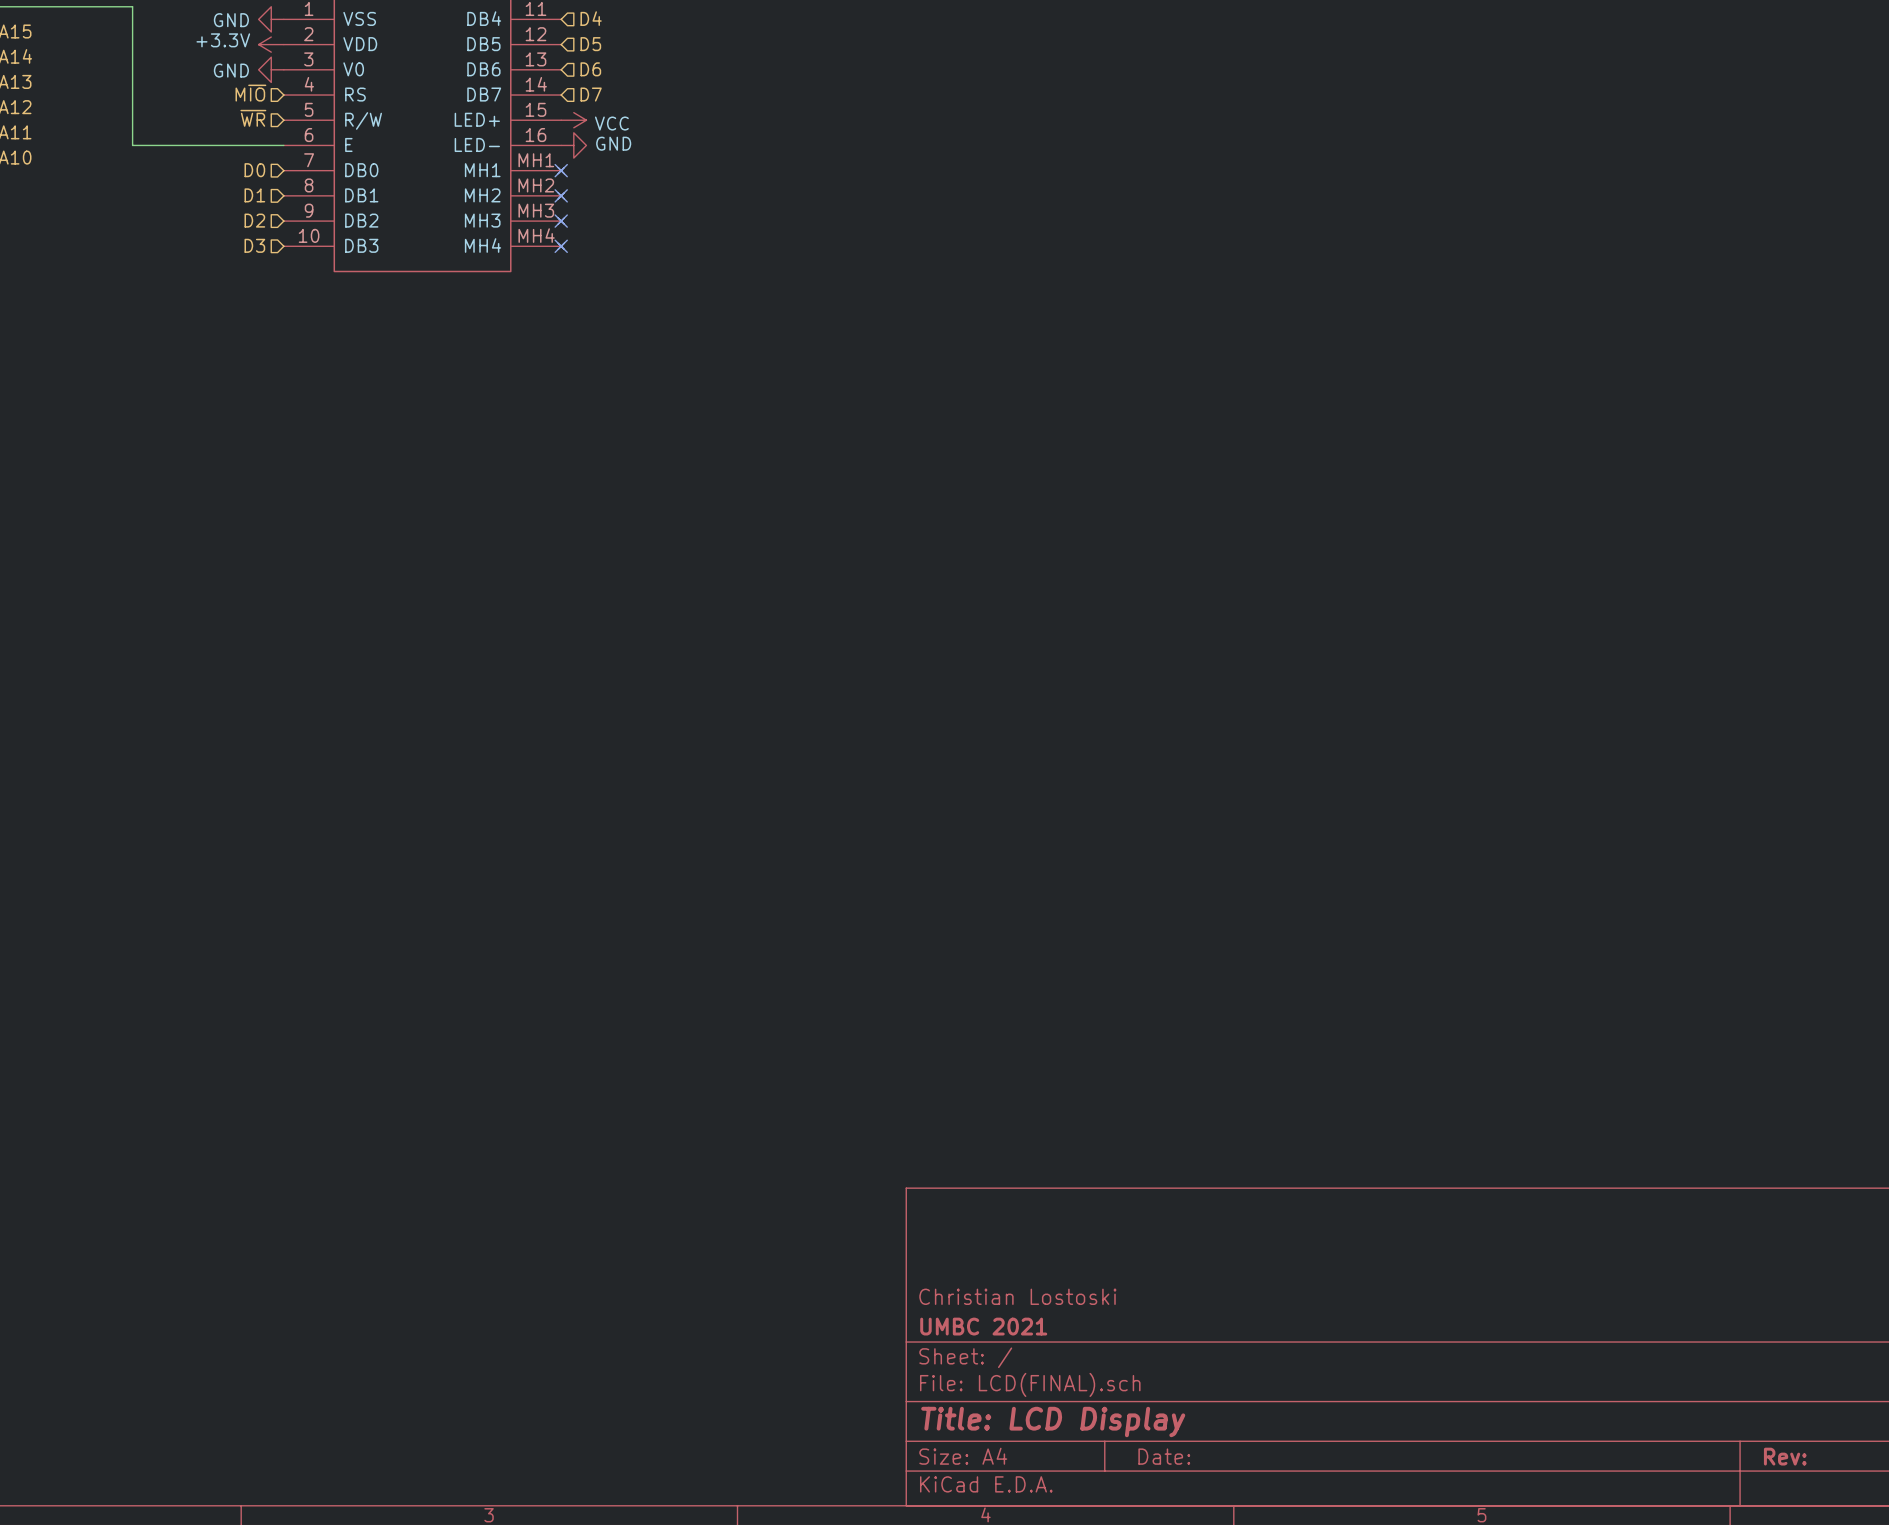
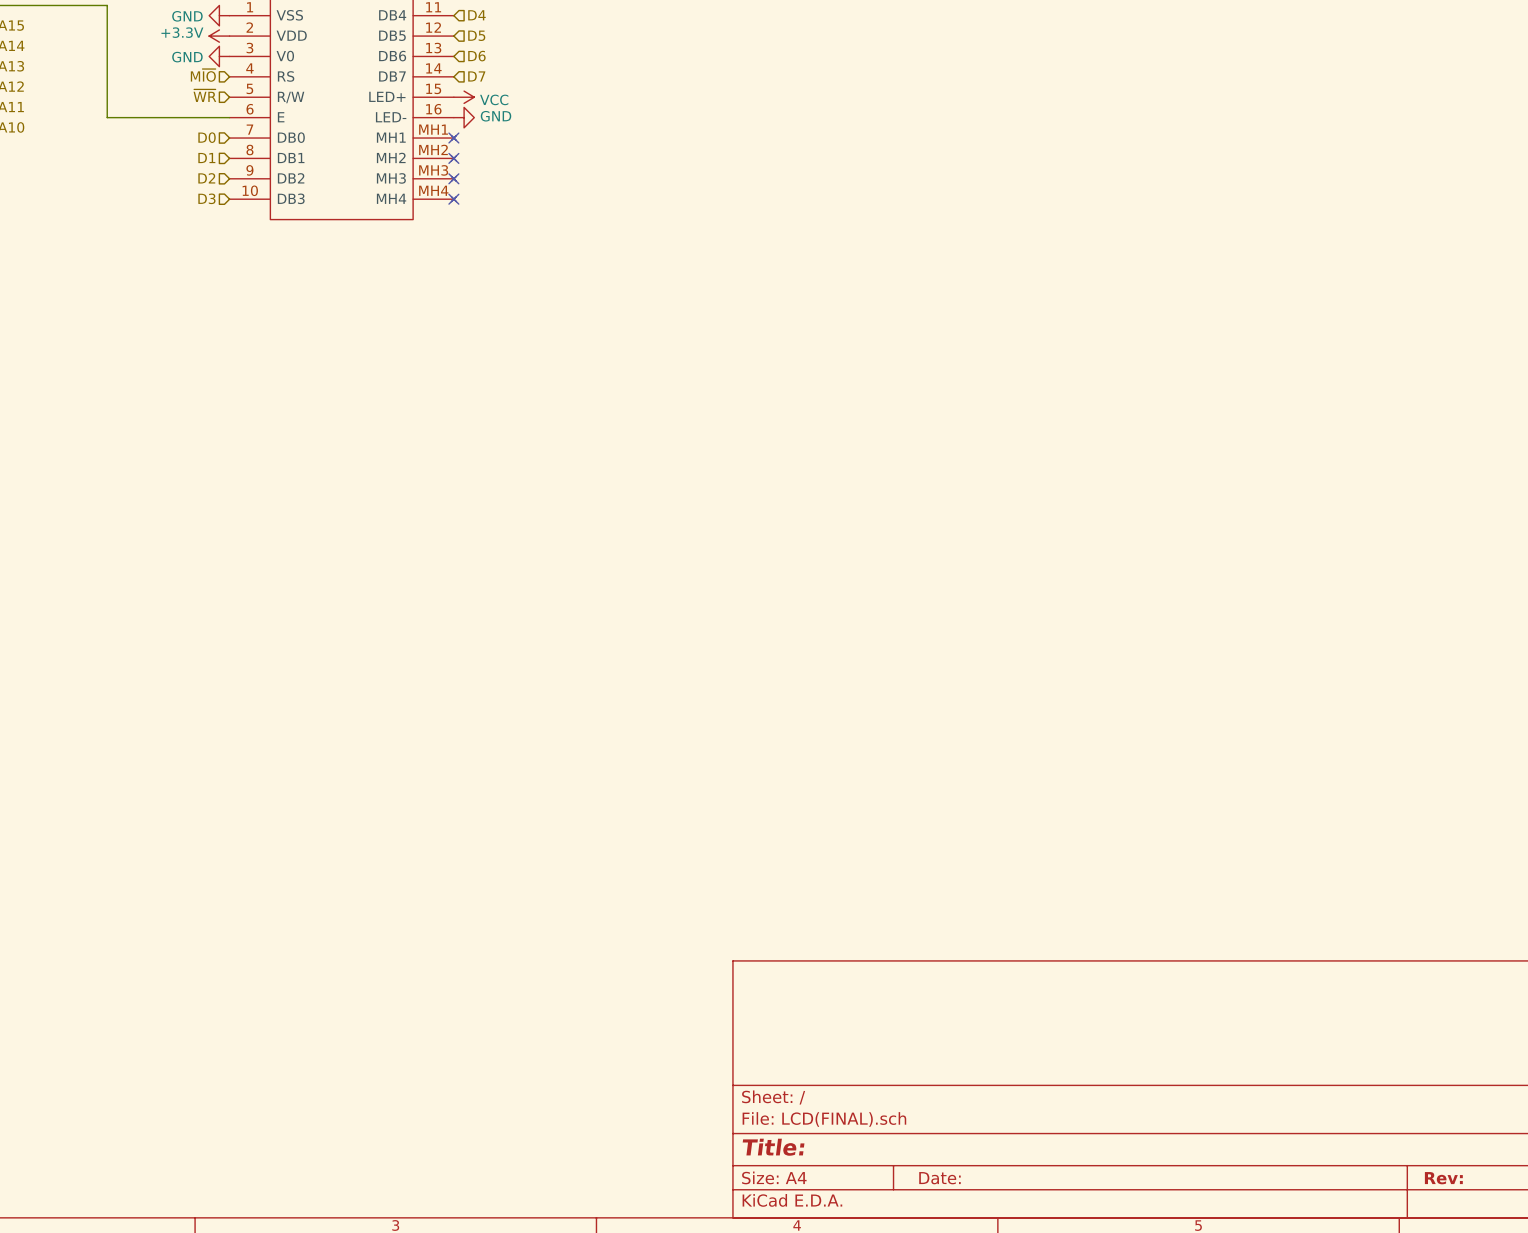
title block: Christian Lostoski (1017, 1296) -> none
title block: UMBC 2021 (983, 1326) -> none
title block: Title: LCD Display (1053, 1422) -> Title: (773, 1147)

